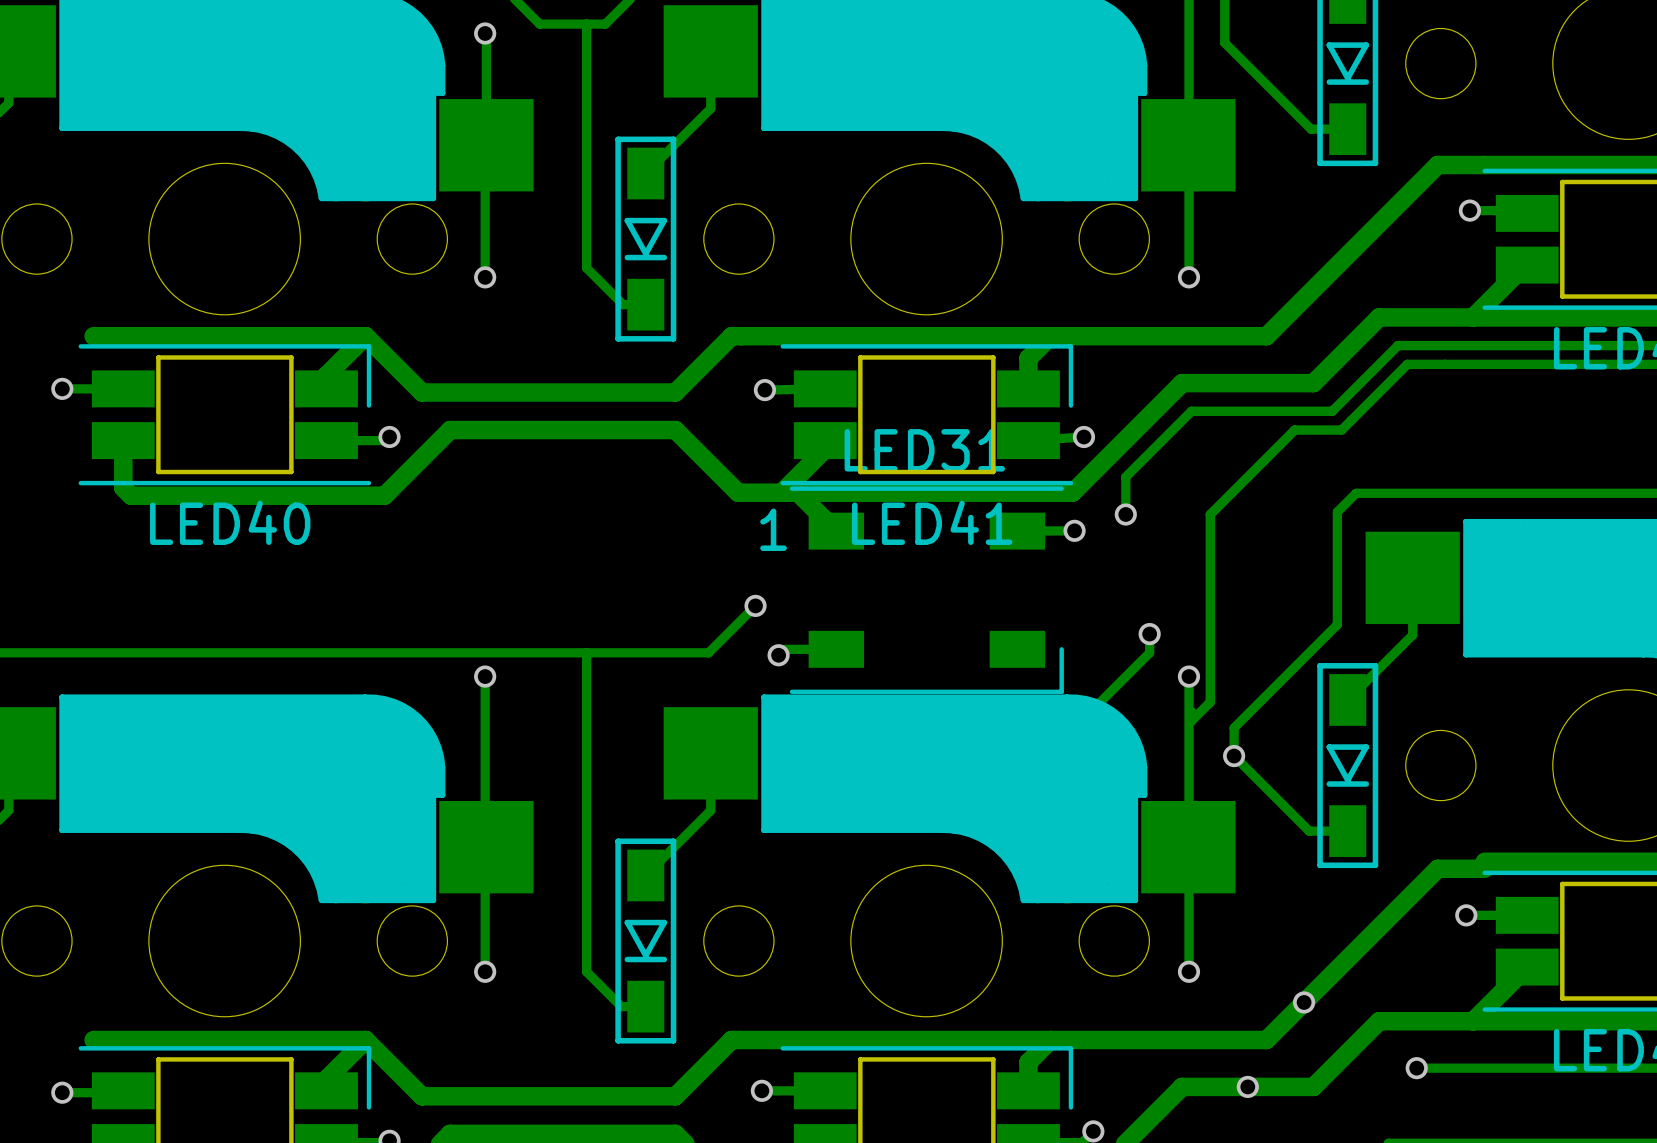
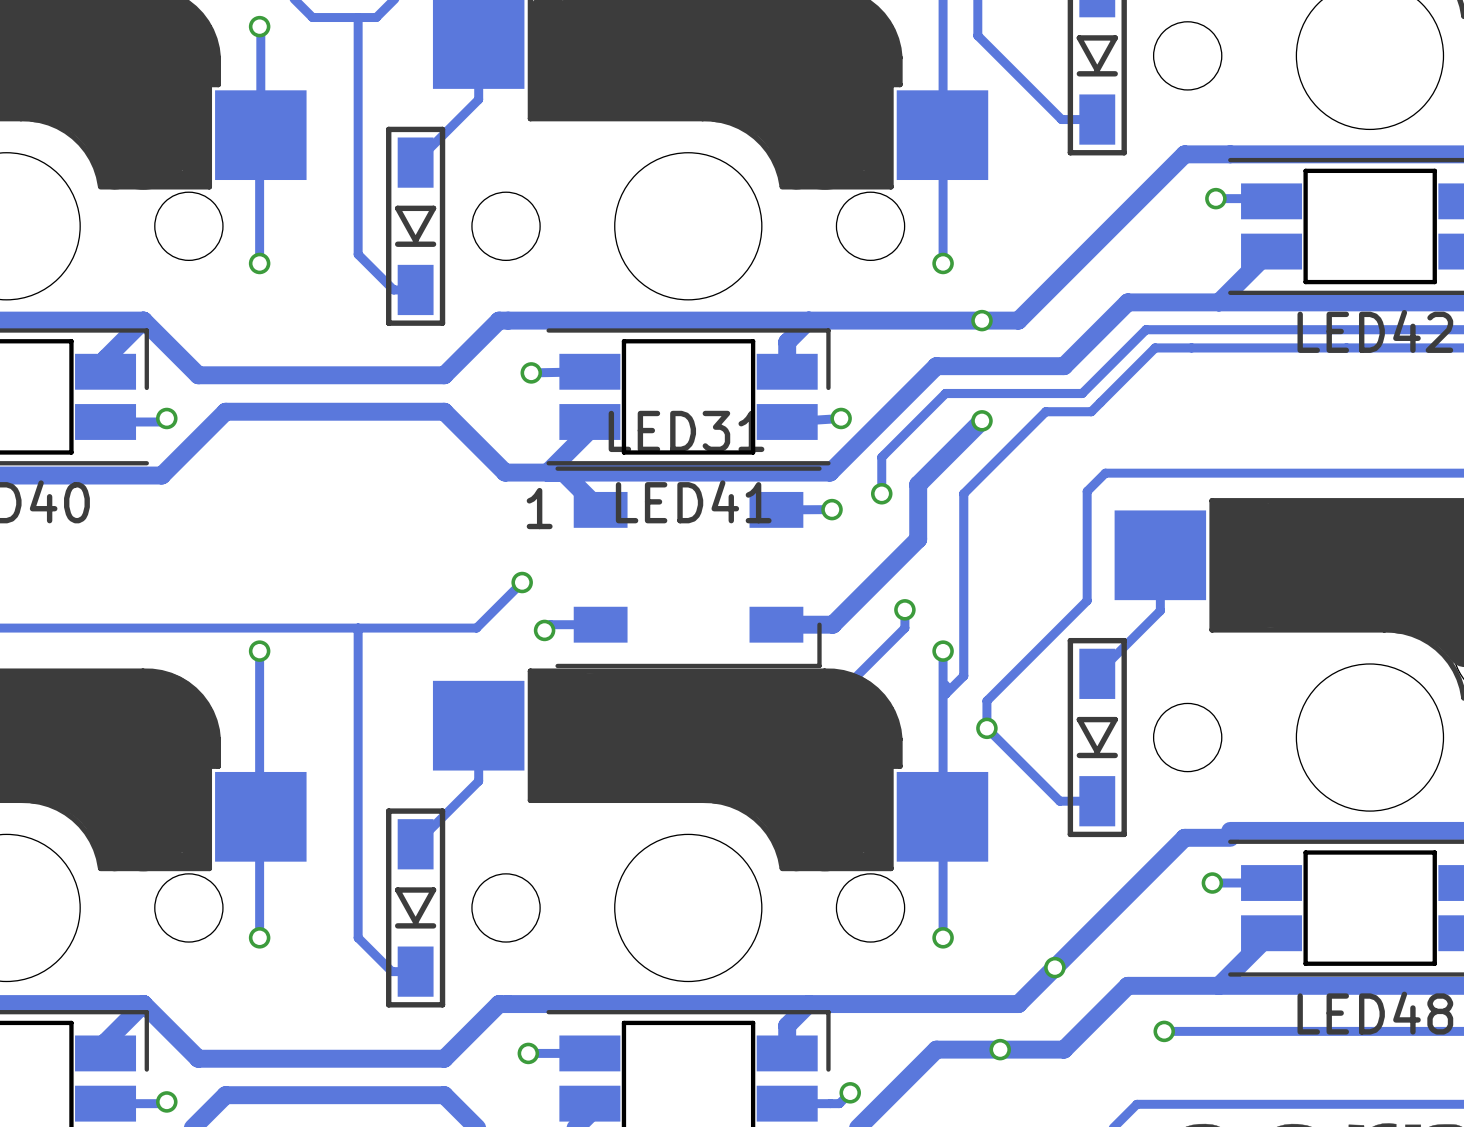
via: none -> (981, 320)
track: none -> (981, 420) (918, 484) (918, 539) (832, 624) (776, 624)
via: none -> (981, 420)

